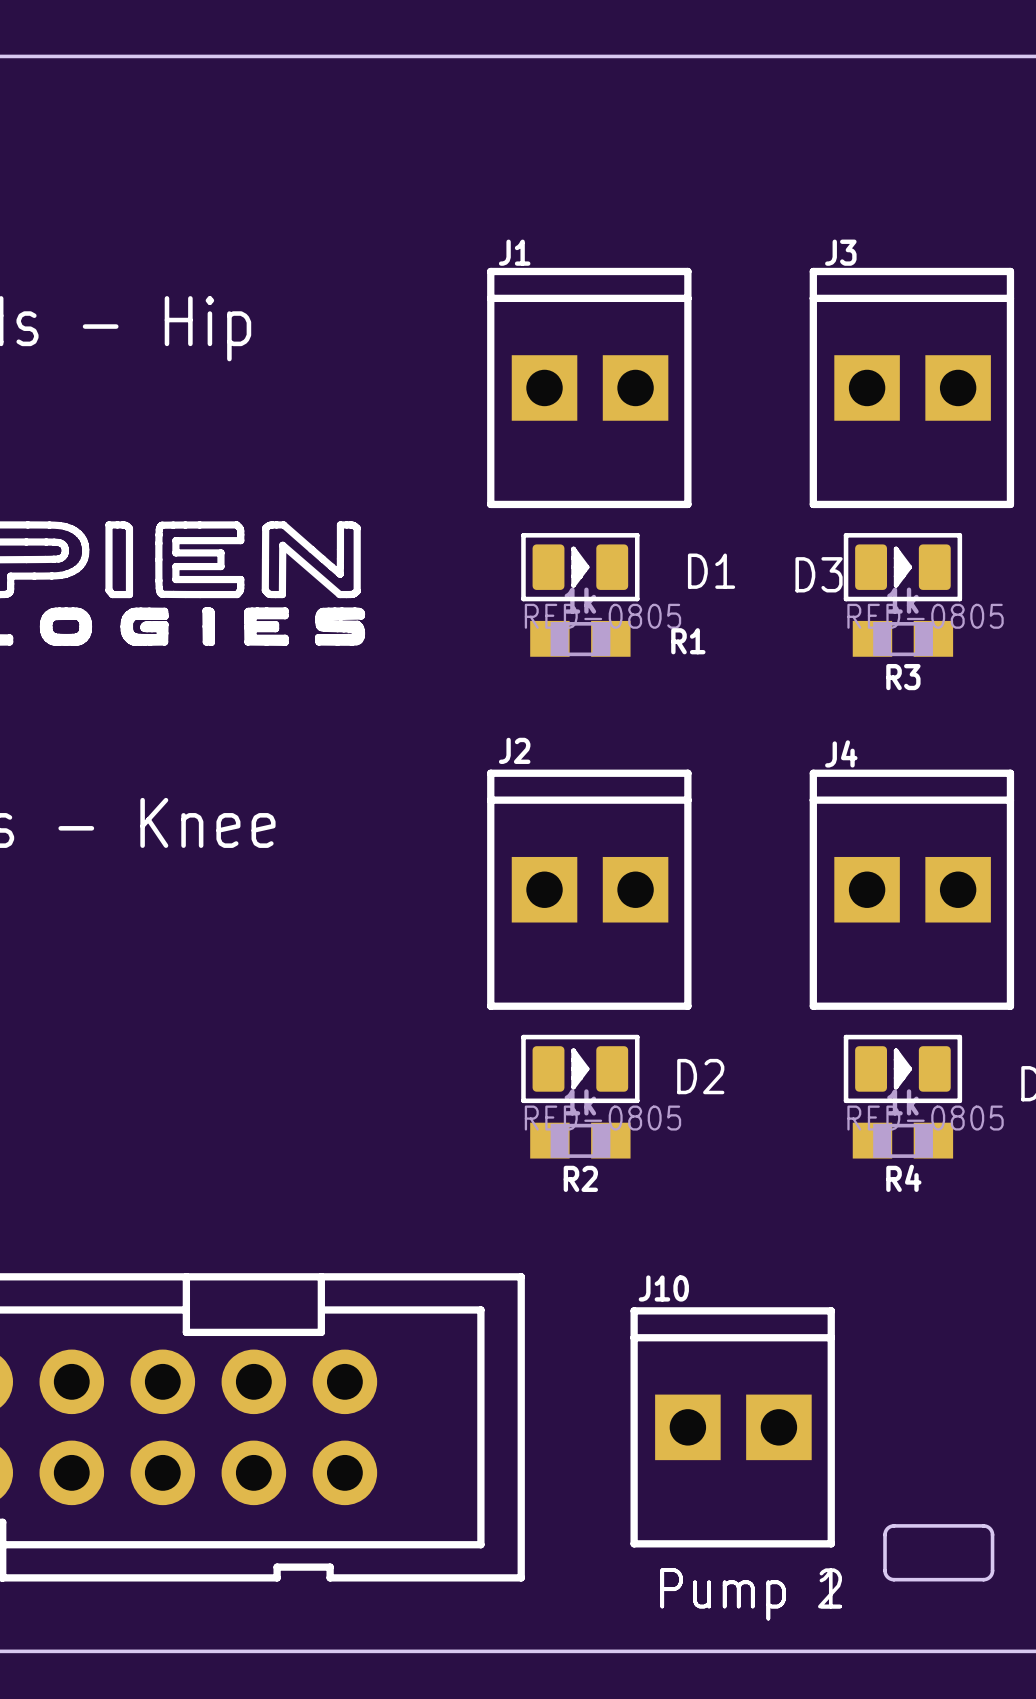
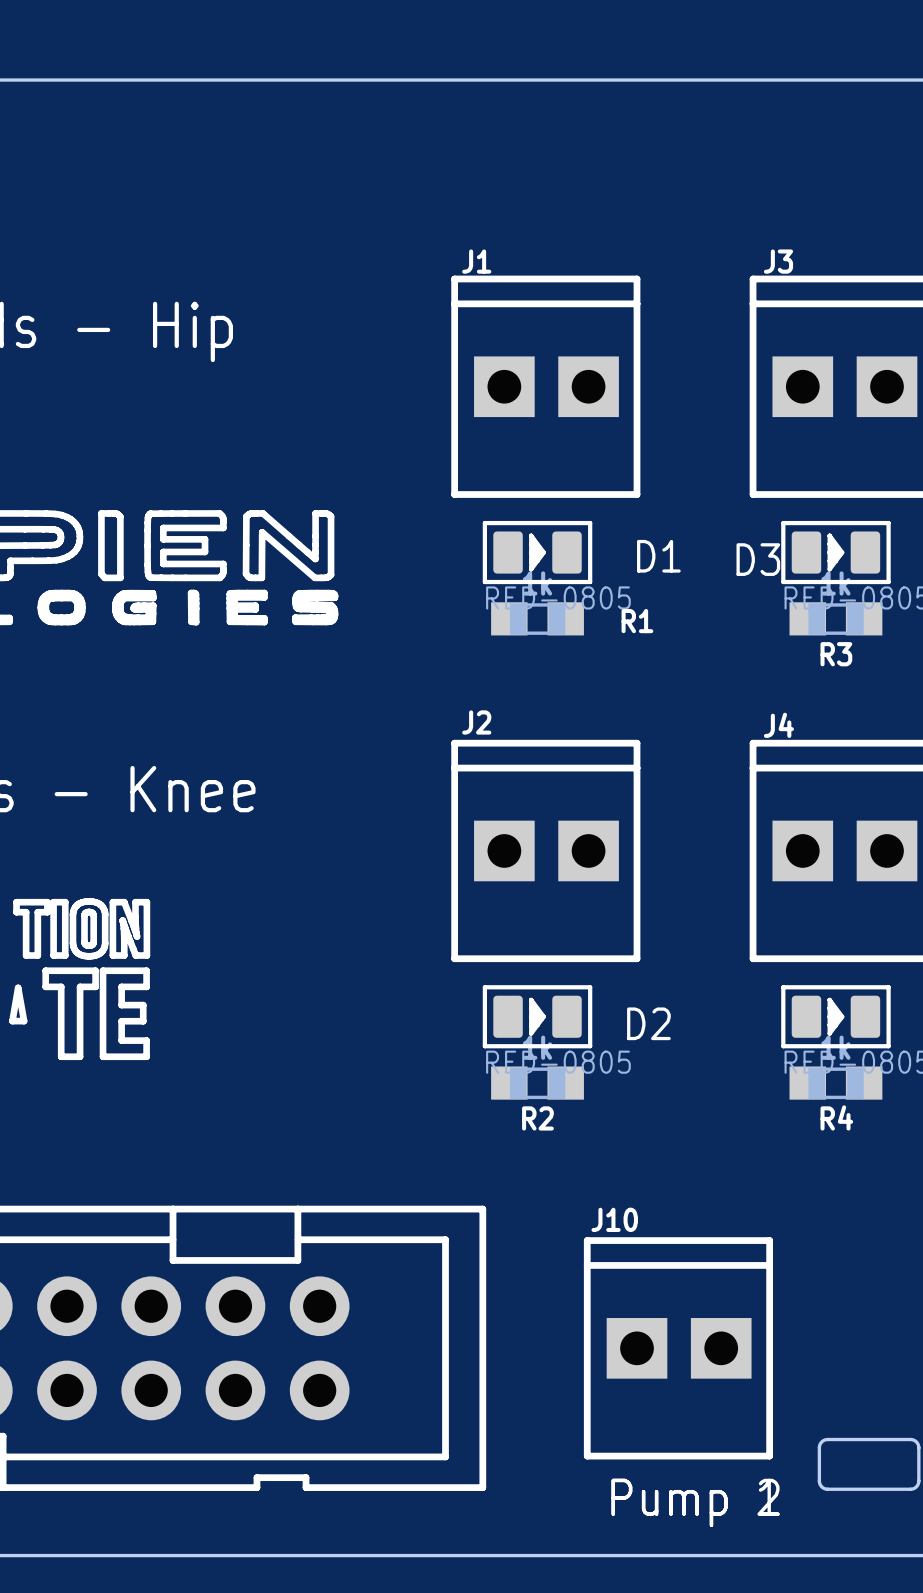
line: none -> (88, 901) (100, 904) (105, 914) (104, 948) (98, 954) (89, 956) (77, 953) (72, 943) (73, 909) (79, 903) (88, 901)
line: none -> (16, 902) (47, 902) (47, 912) (37, 912) (37, 955) (26, 955) (26, 912) (16, 912) (16, 902)
line: none -> (53, 902) (65, 902) (65, 955) (53, 955) (53, 902)
line: none -> (88, 911) (84, 915) (84, 942) (89, 945) (93, 942) (93, 915) (88, 911)
line: none -> (122, 920) (124, 955) (112, 955) (112, 902) (124, 902) (137, 936) (135, 902) (146, 902) (146, 955) (135, 955) (122, 920)
line: none -> (45, 970) (95, 970) (95, 986) (80, 986) (80, 1056) (61, 1056) (61, 986) (45, 986) (45, 970)
line: none -> (103, 970) (146, 970) (146, 986) (121, 986) (121, 1005) (143, 1005) (143, 1021) (121, 1021) (121, 1040) (146, 1040) (146, 1056) (103, 1056) (103, 970)
line: none -> (18, 987) (12, 1021) (24, 1021) (18, 987)

